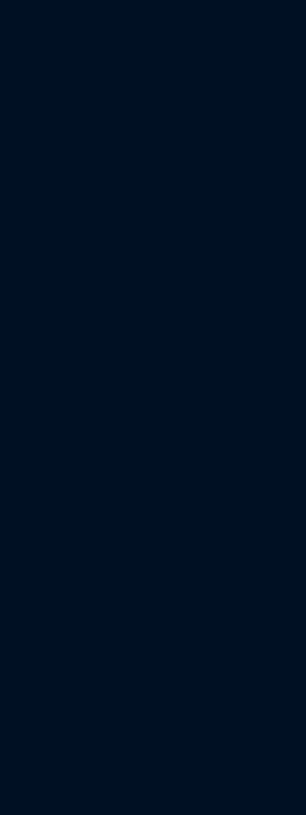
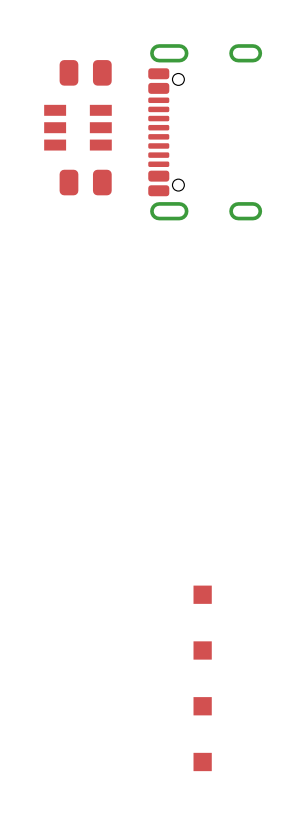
part: none -> (85, 72)
part: none -> (77, 127)
part: none -> (205, 132)
part: none -> (85, 182)
part: none -> (202, 594)
part: none -> (202, 650)
part: none -> (202, 706)
part: none -> (202, 761)

